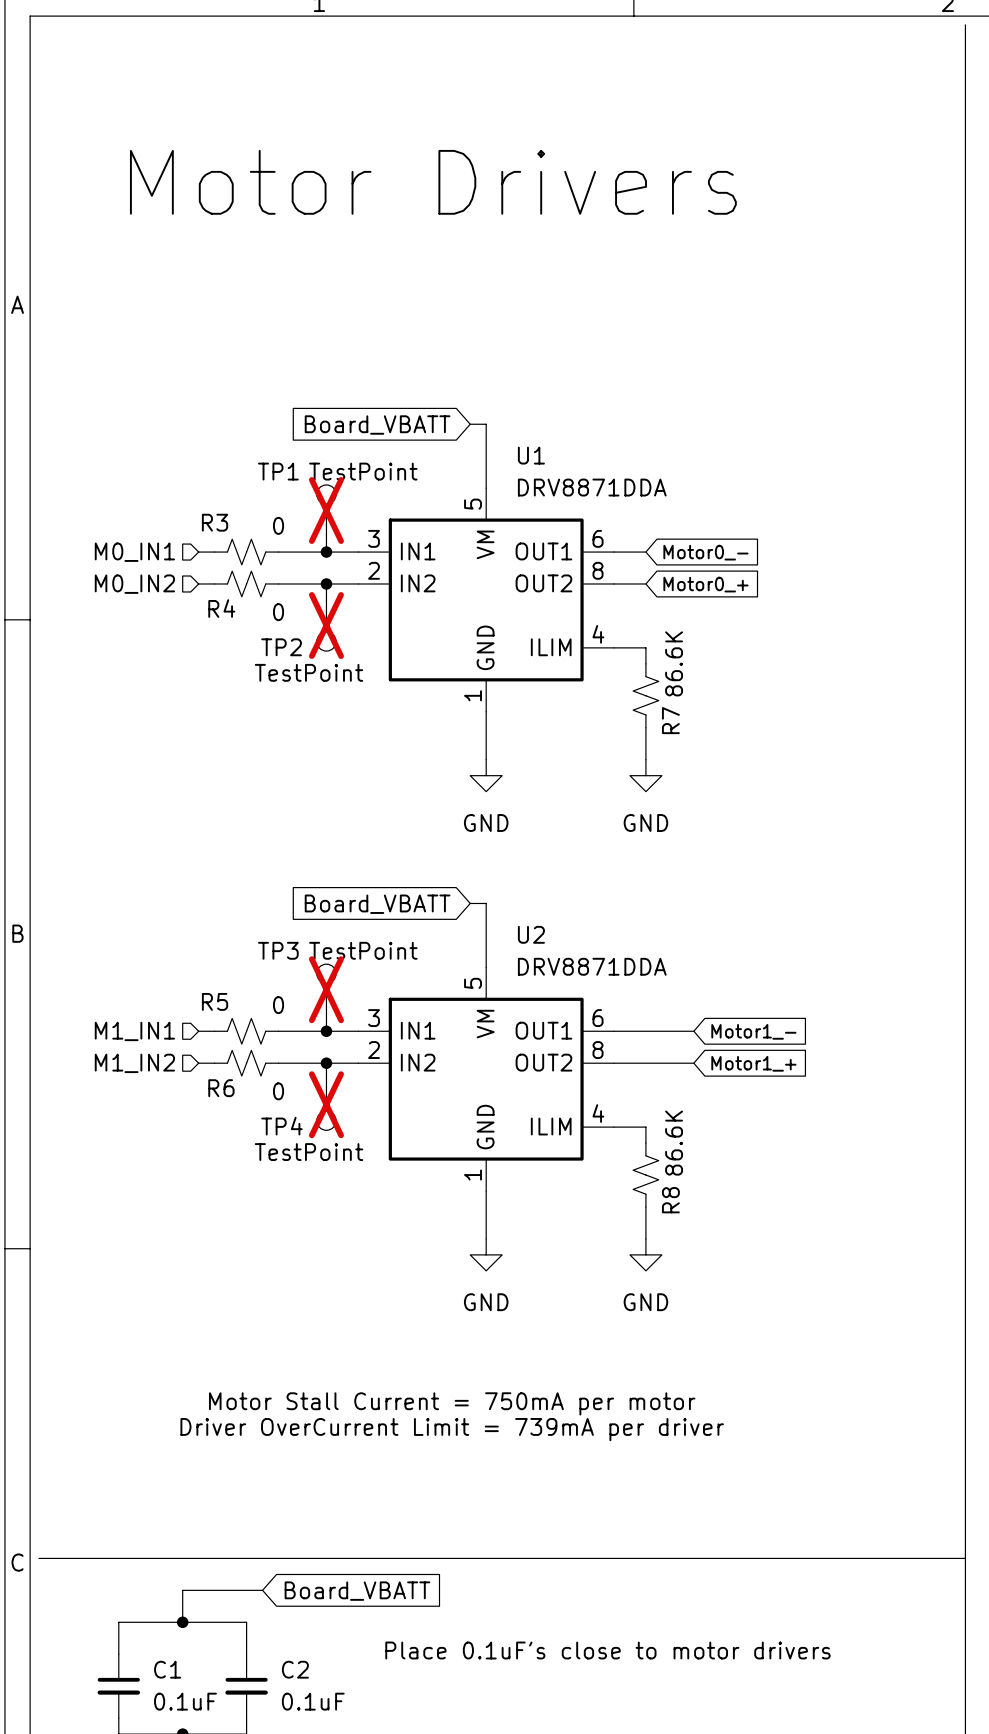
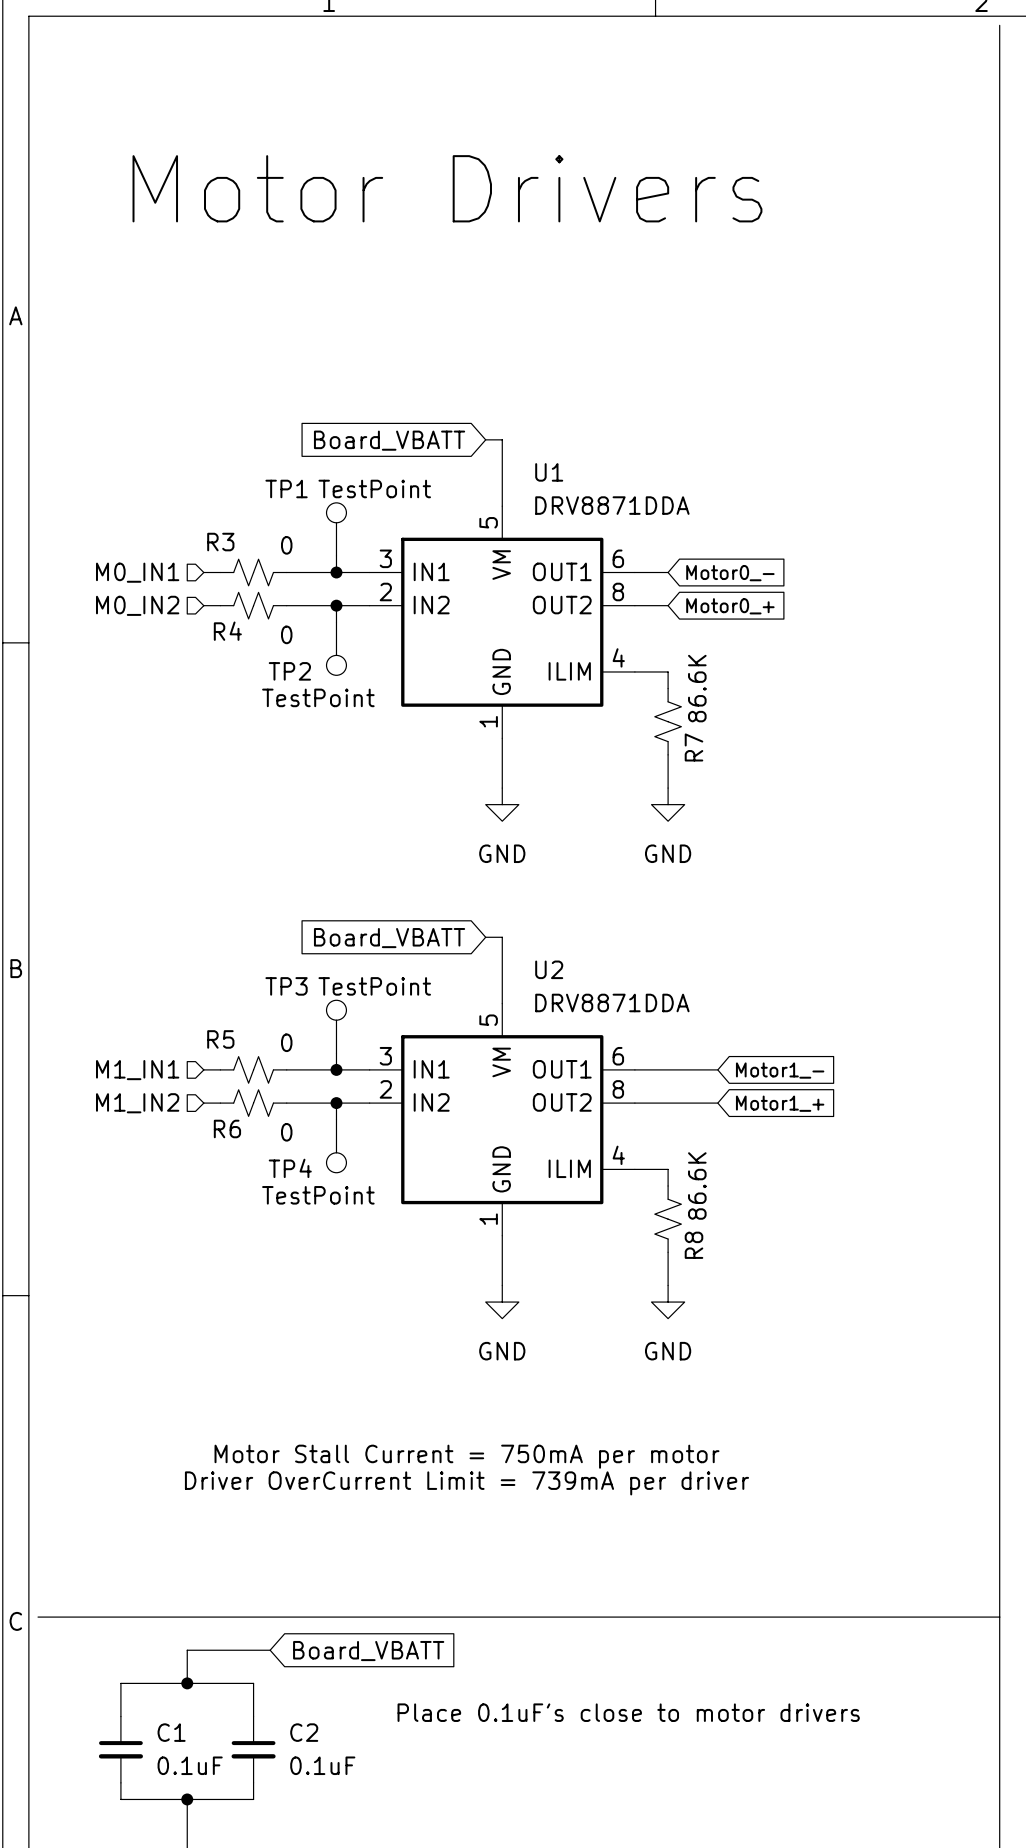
TP1 do-not-place cross: (326, 510) -> none
TP2 do-not-place cross: (326, 625) -> none
TP3 do-not-place cross: (326, 989) -> none
TP4 do-not-place cross: (326, 1104) -> none

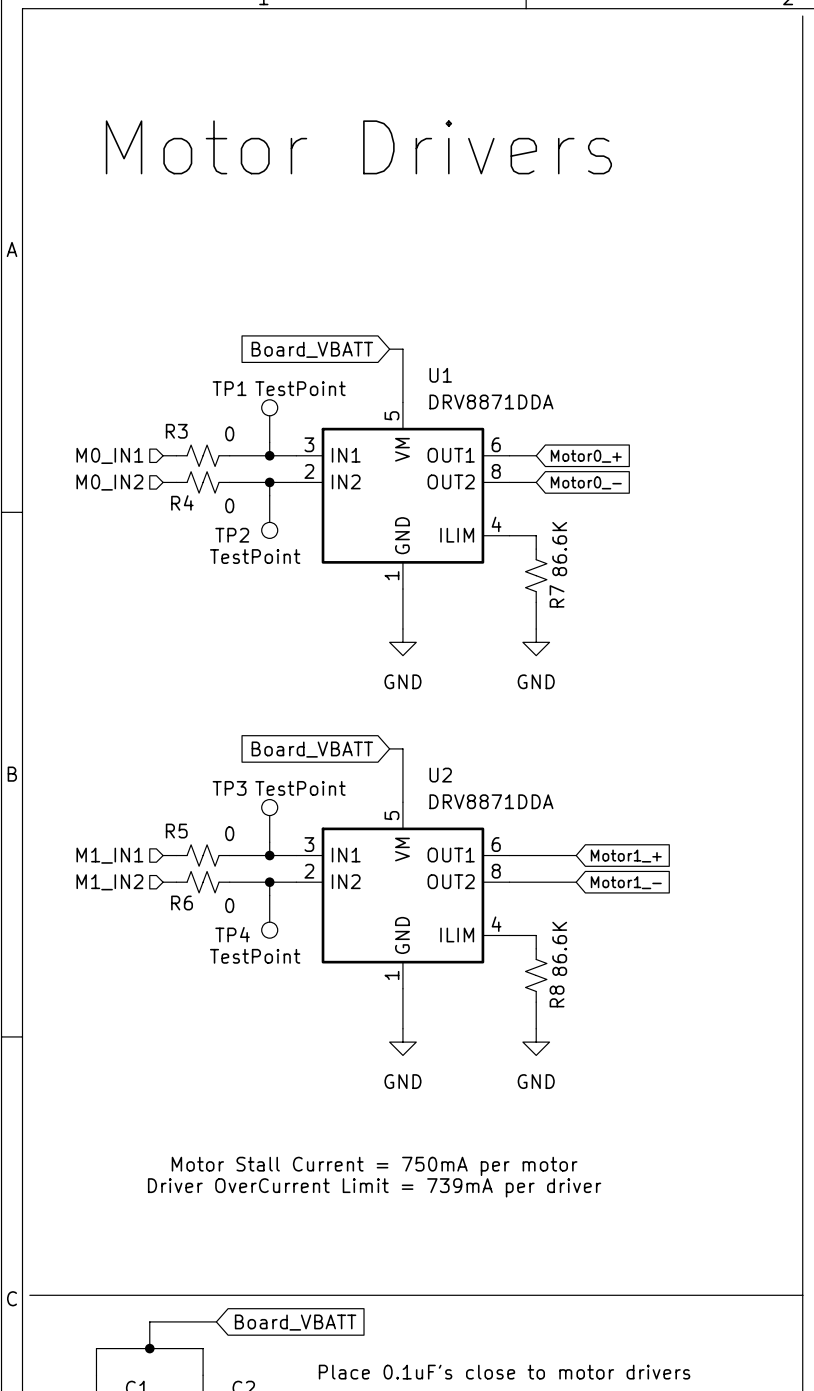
global label: Motor0_- (730, 573) -> Motor0_+ (586, 456)
global label: Motor0_+ (730, 606) -> Motor0_- (586, 482)
global label: Motor1_- (780, 1070) -> Motor1_+ (626, 856)
global label: Motor1_+ (780, 1103) -> Motor1_- (626, 882)

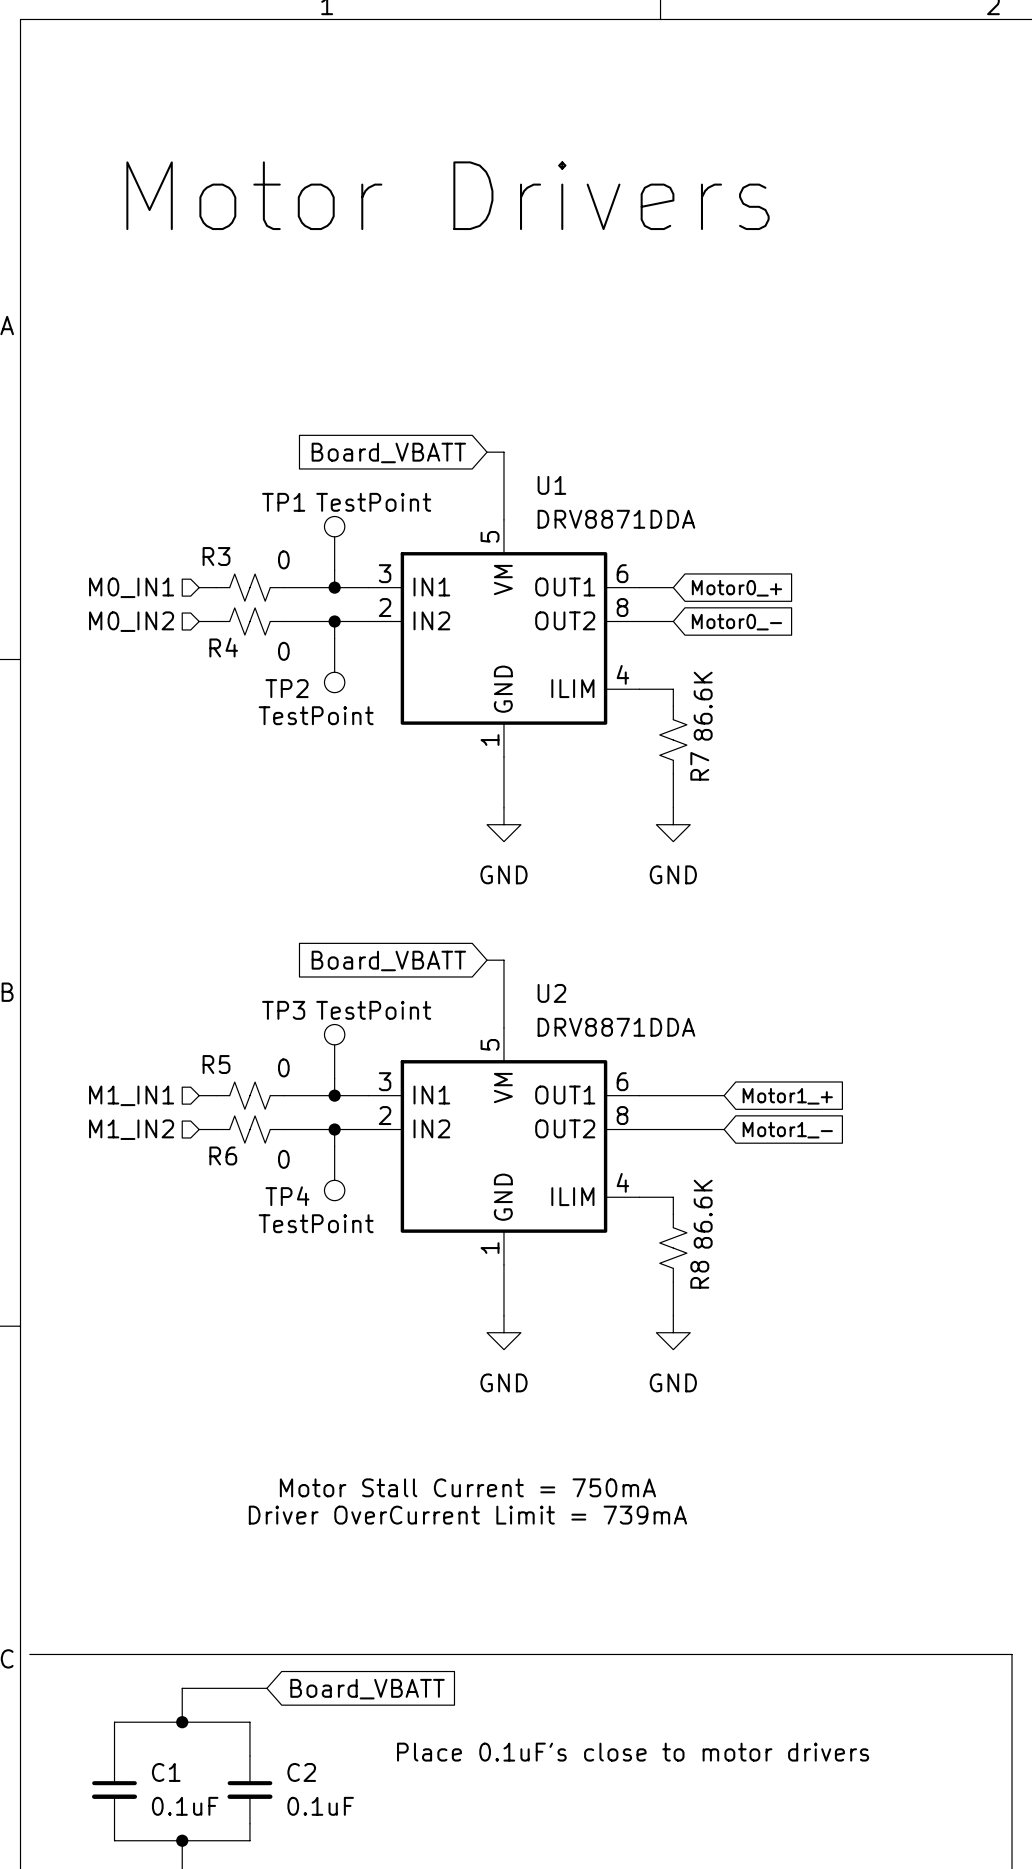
line: (802, 16) (802, 1295) -> none
text: Motor Stall Current = 750mA per motor (374, 1166) -> Motor Stall Current = 750mA (467, 1487)
text: Driver OverCurrent Limit = 739mA per driver (374, 1187) -> Driver OverCurrent Limit = 739mA (467, 1515)

